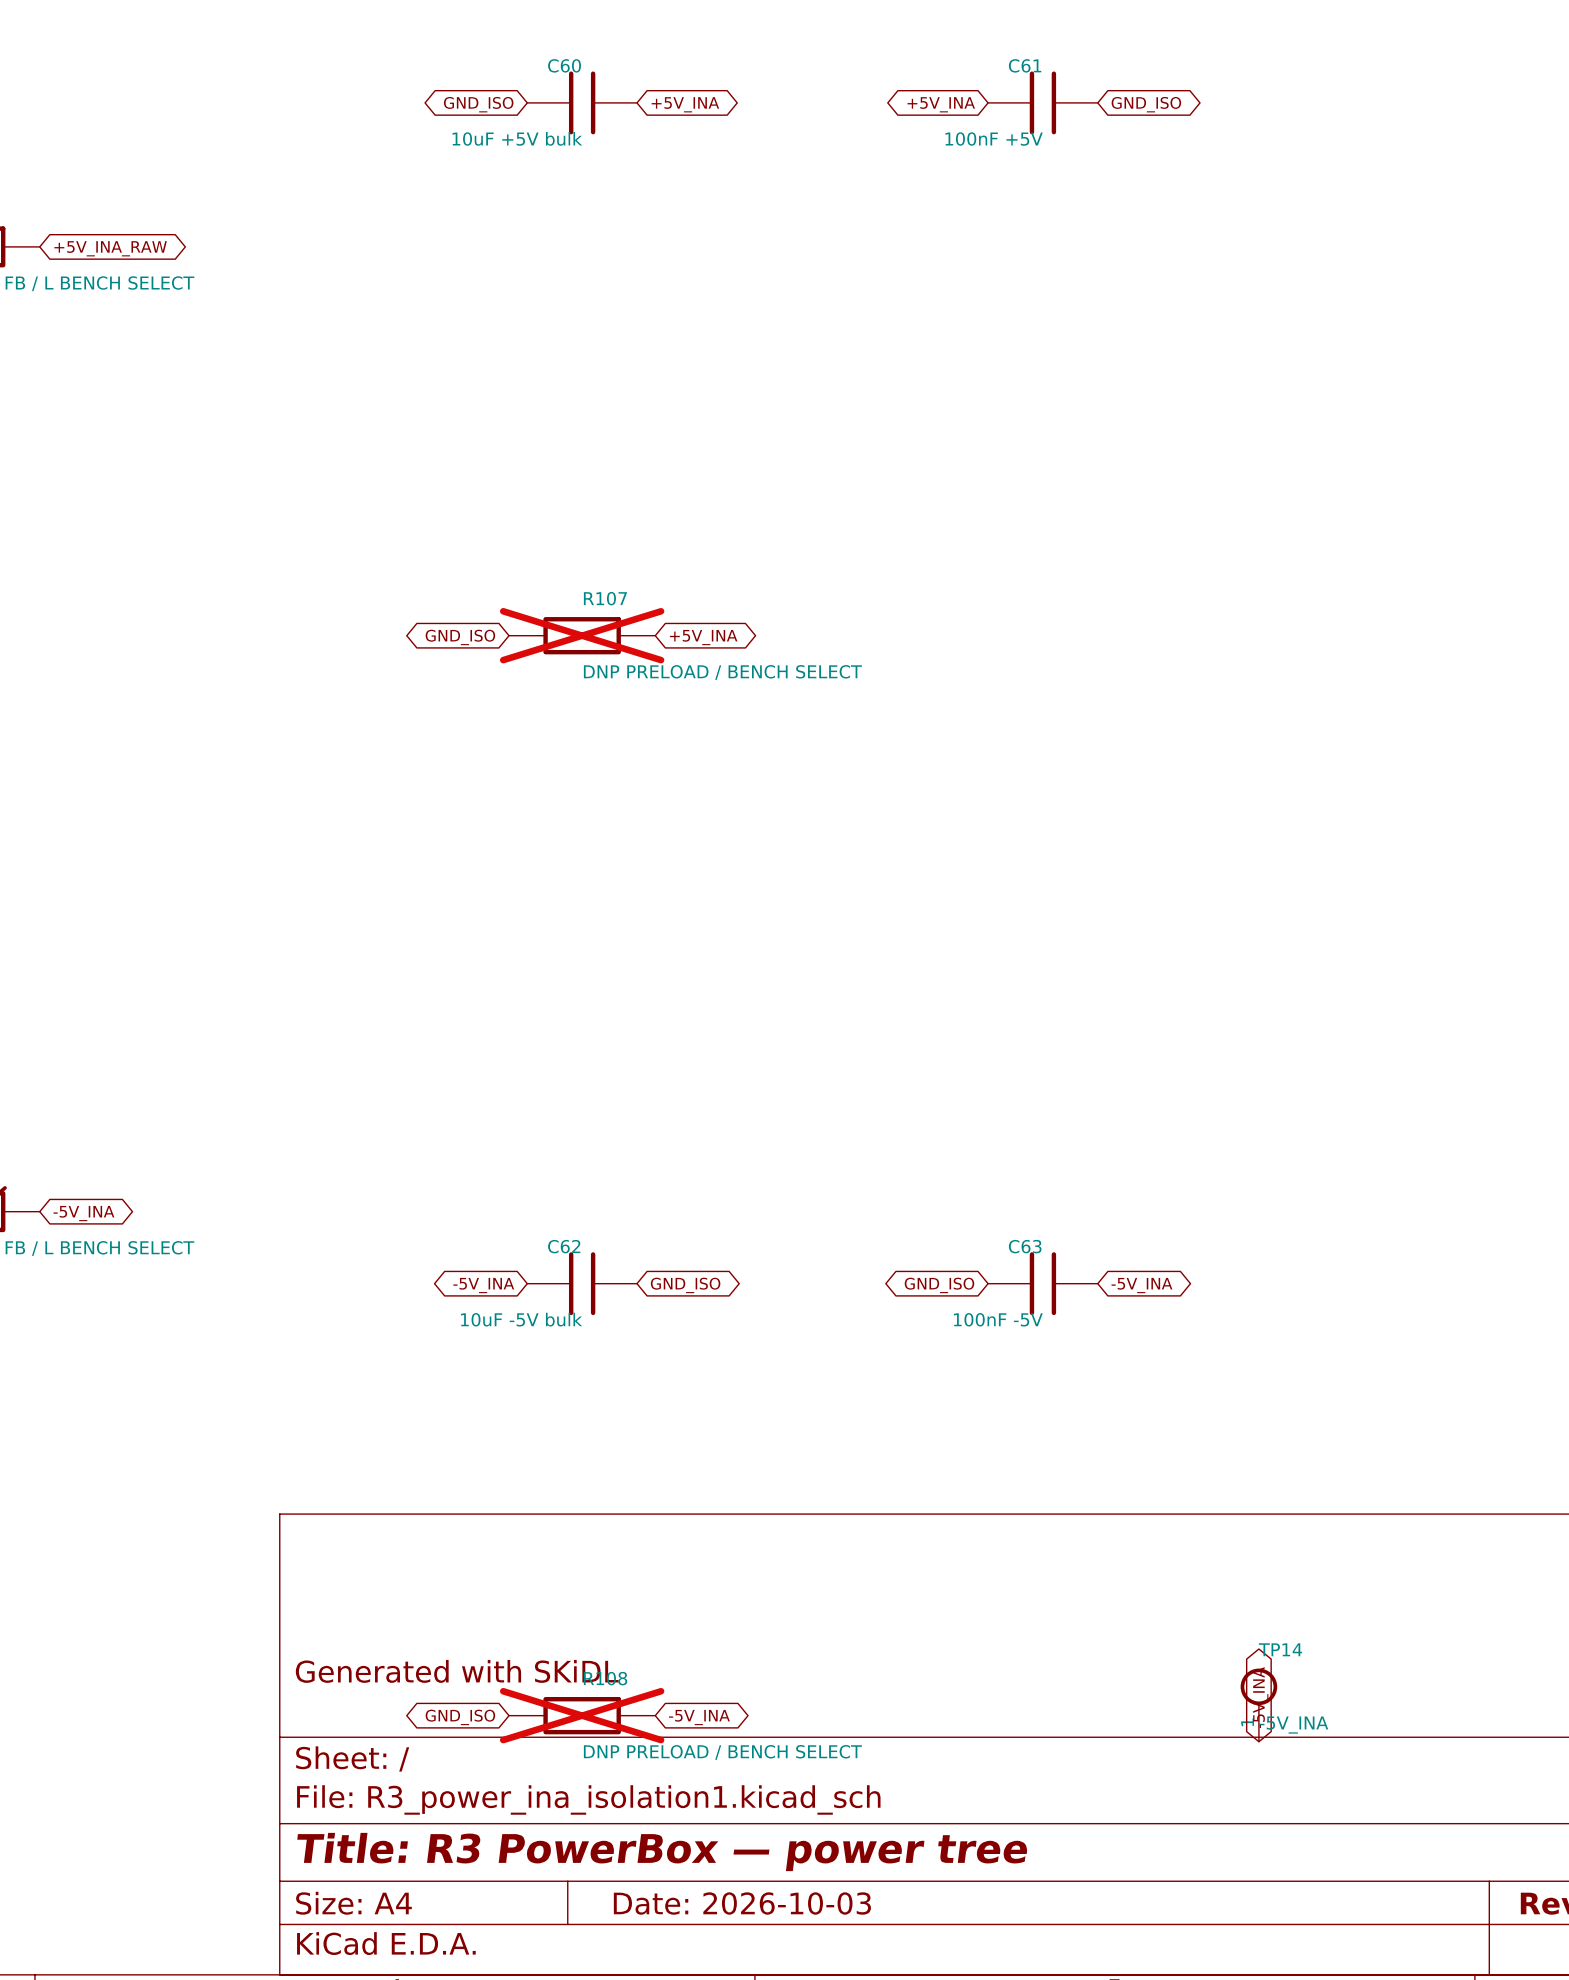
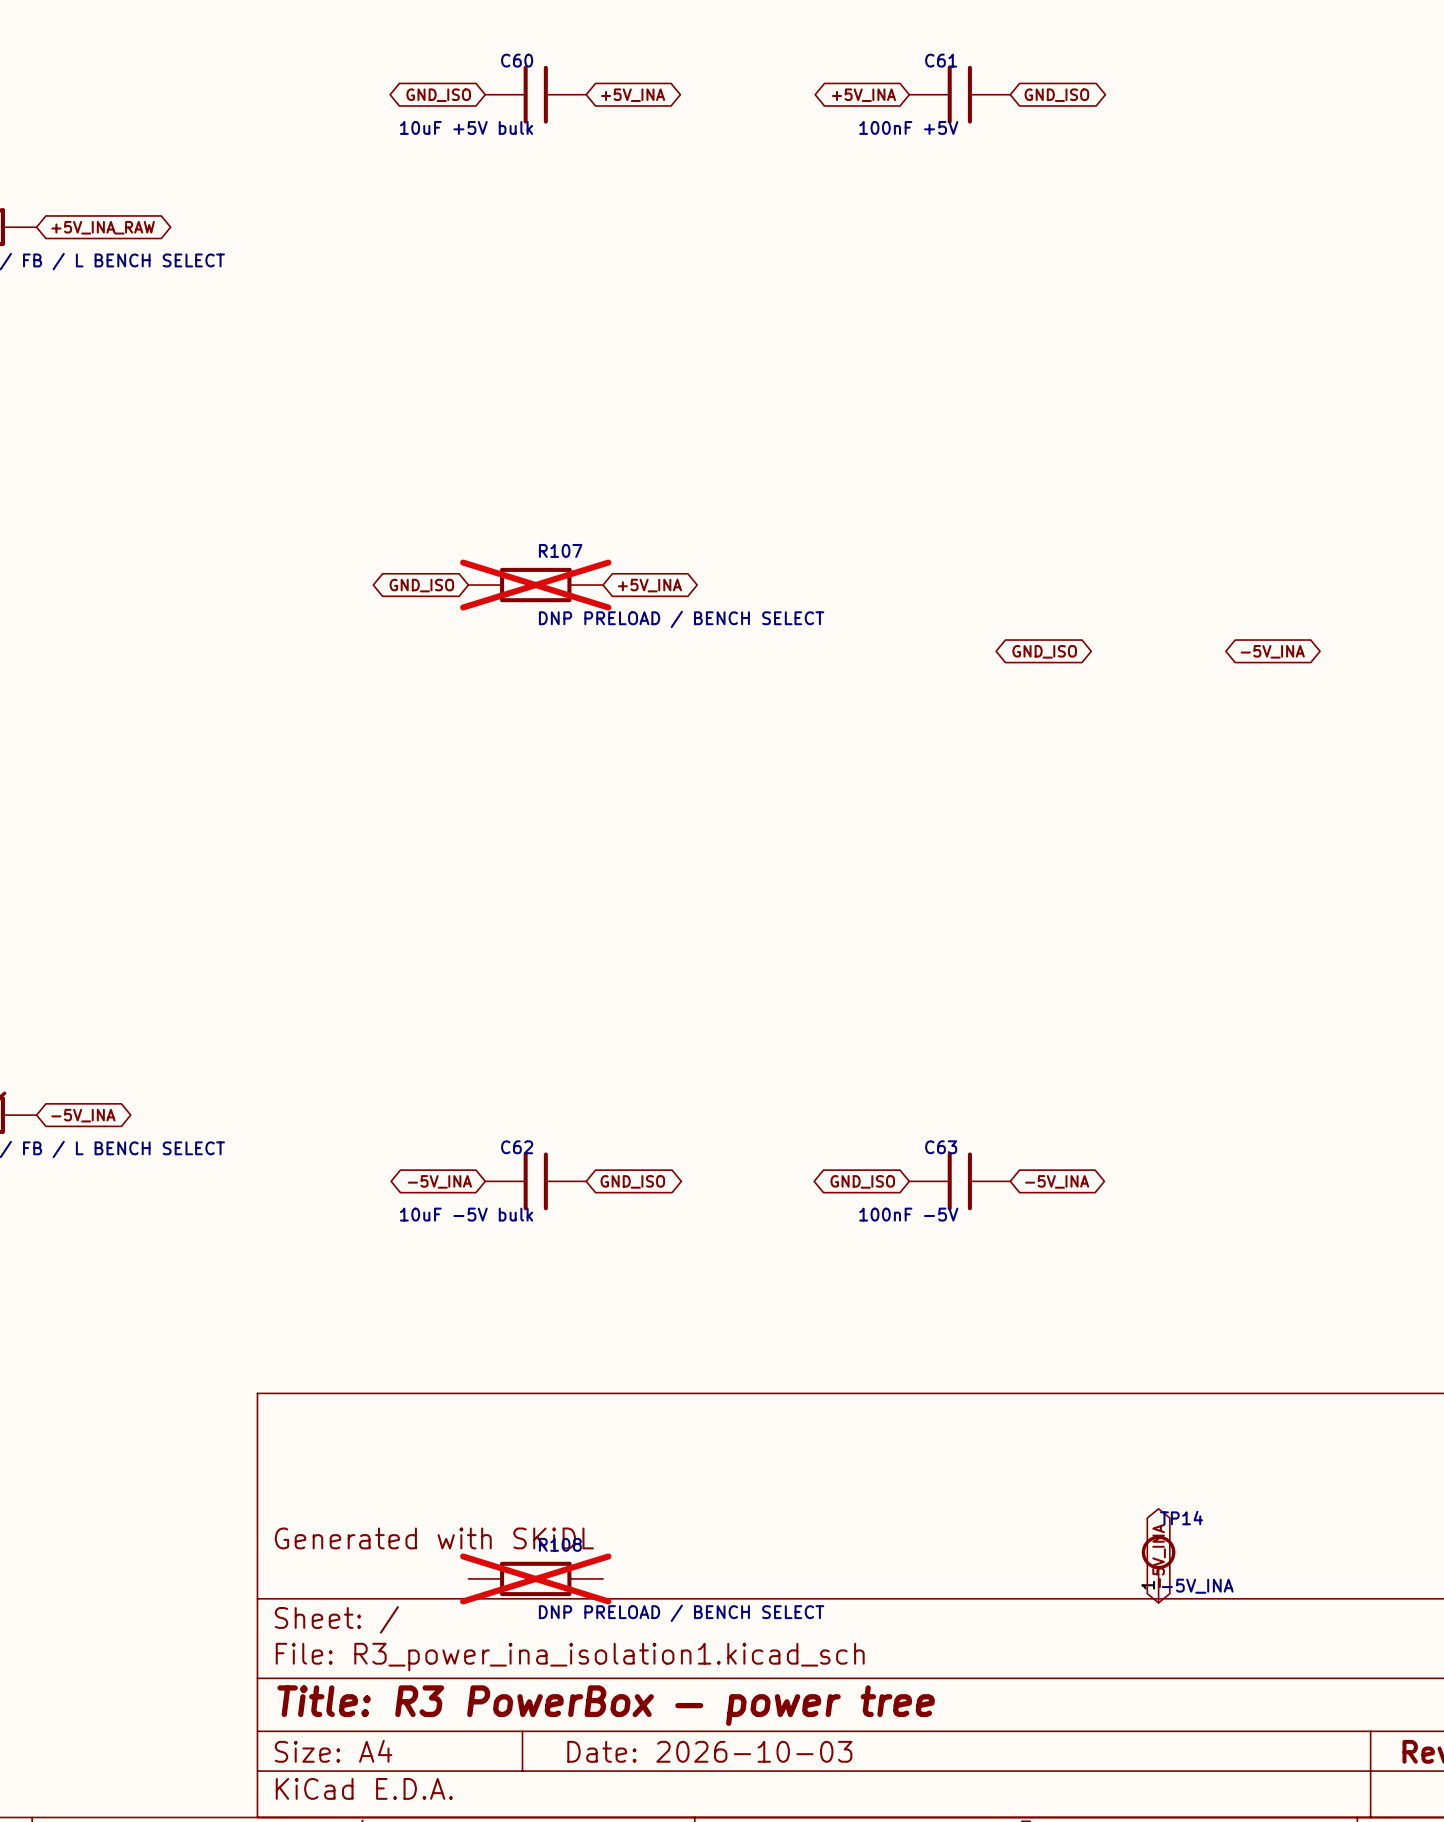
global label: none -> GND_ISO (1044, 651)
global label: none -> -5V_INA (1272, 651)
global label: GND_ISO (460, 1717) -> none
global label: -5V_INA (699, 1717) -> none

